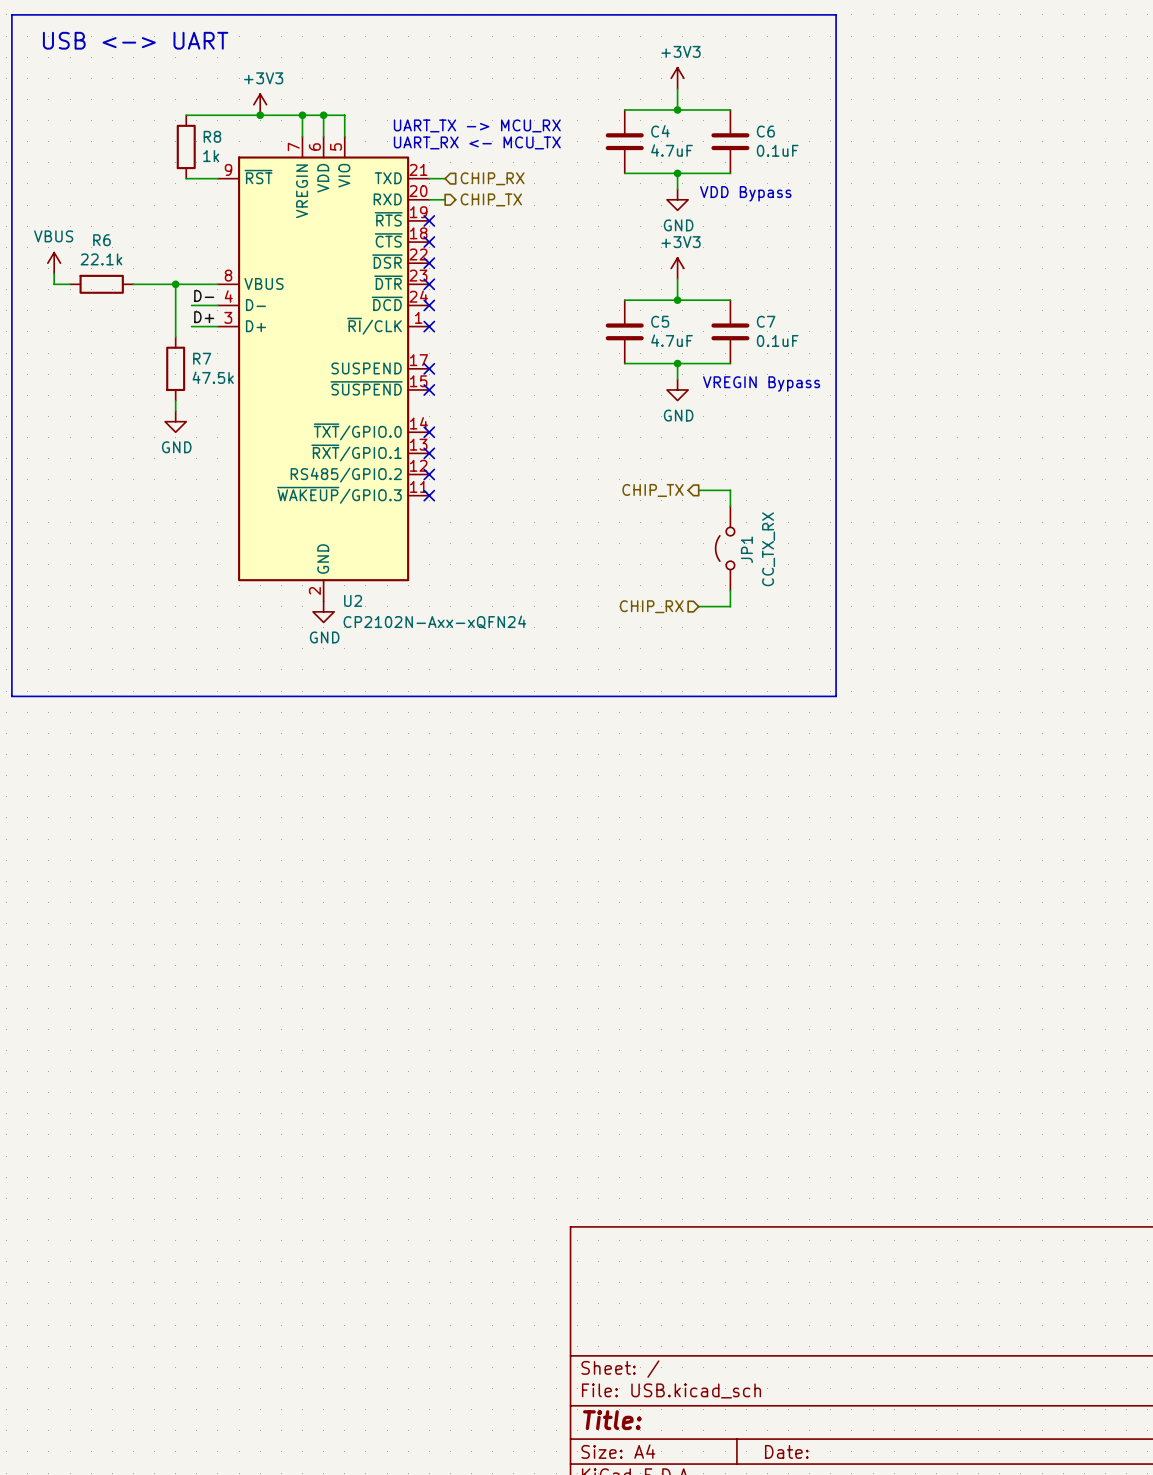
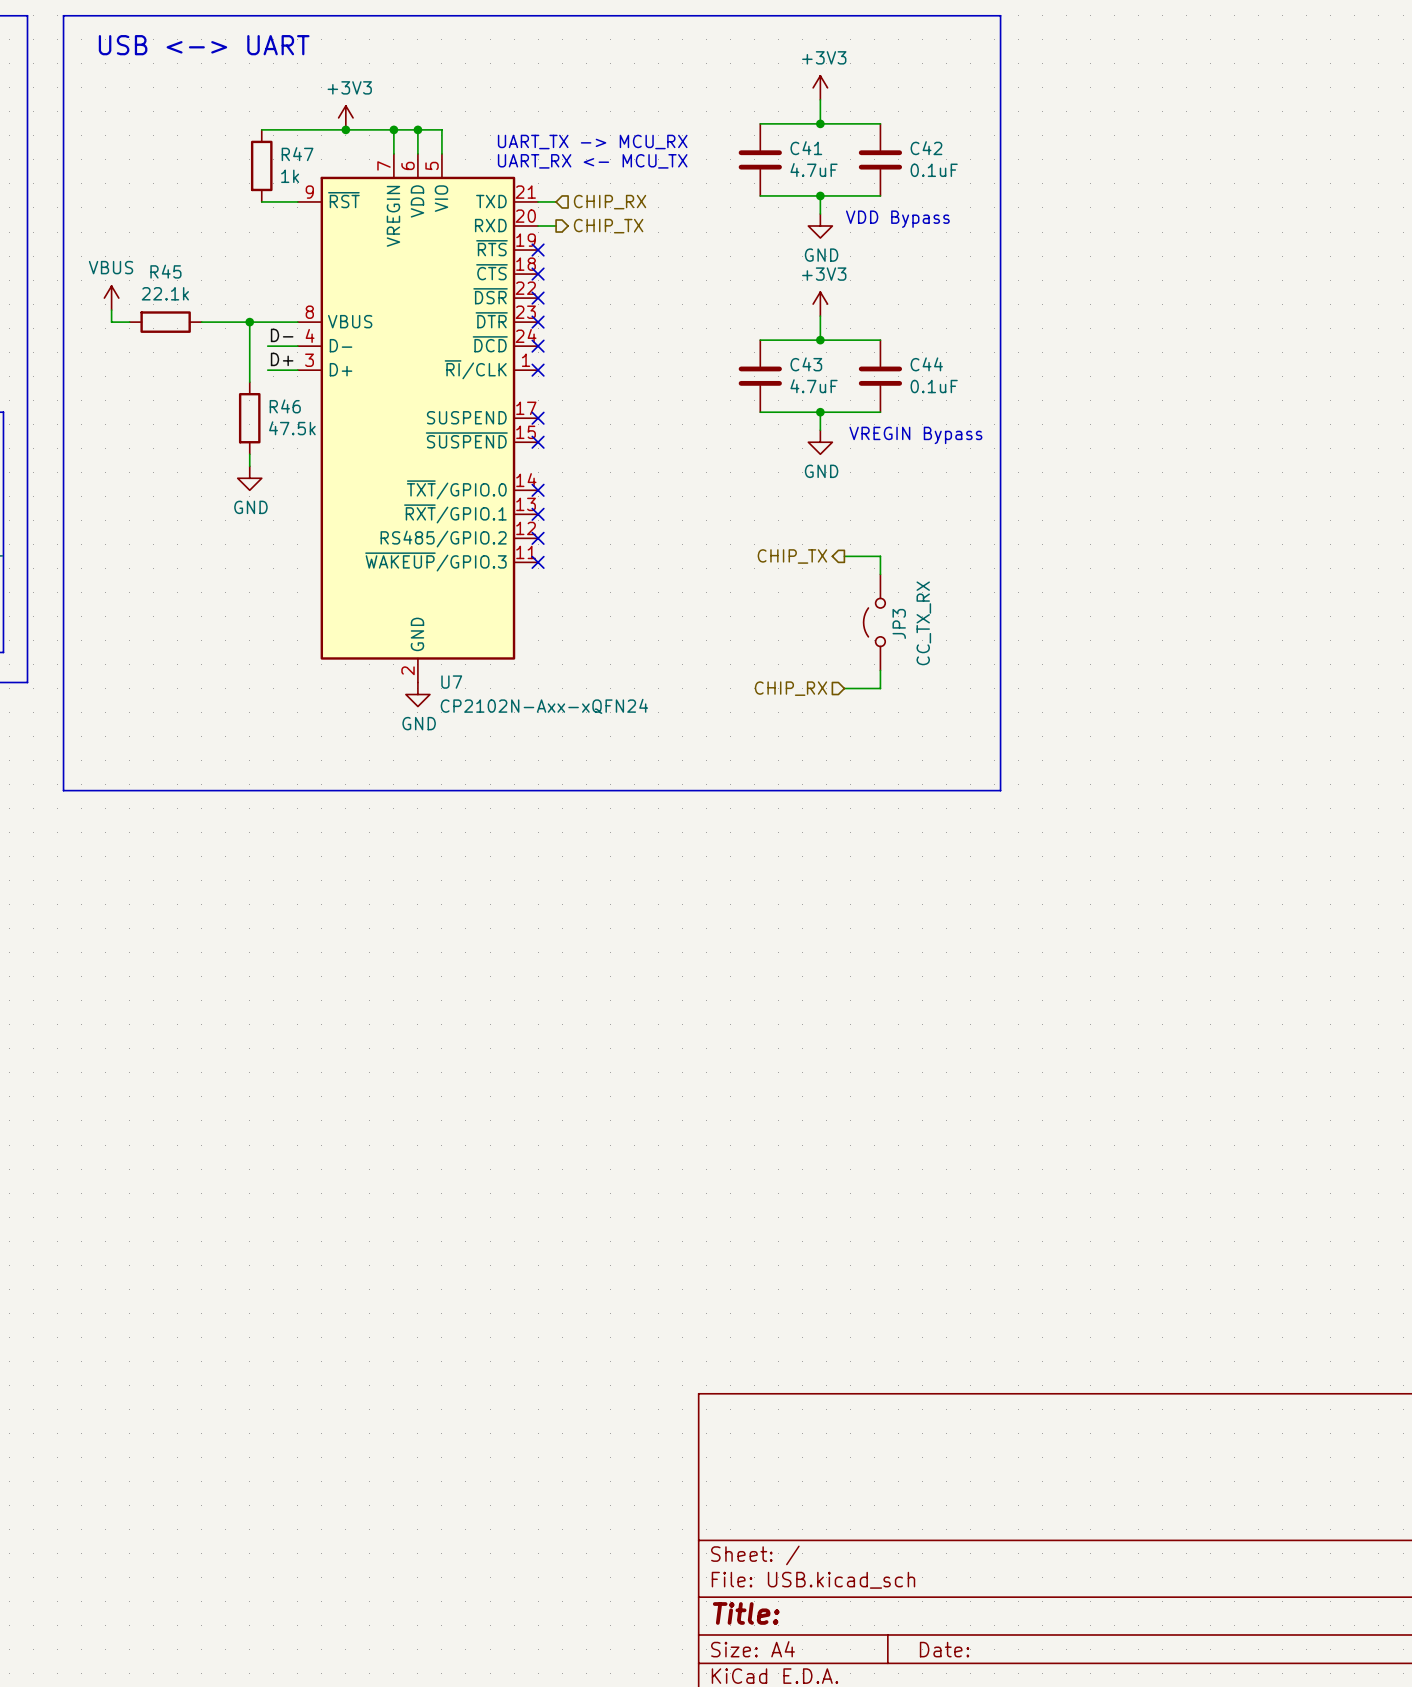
C4 name: C4 (660, 131) -> C41 (806, 148)
C6 name: C6 (765, 131) -> C42 (926, 148)
R8 name: R8 (212, 136) -> R47 (297, 154)
R6 name: R6 (101, 240) -> R45 (165, 271)
C5 name: C5 (660, 321) -> C43 (806, 364)
C7 name: C7 (766, 321) -> C44 (926, 364)
R7 name: R7 (202, 358) -> R46 (285, 406)
JP1 name: JP1 (746, 549) -> JP3 (899, 623)
U2 name: U2 (353, 600) -> U7 (451, 682)

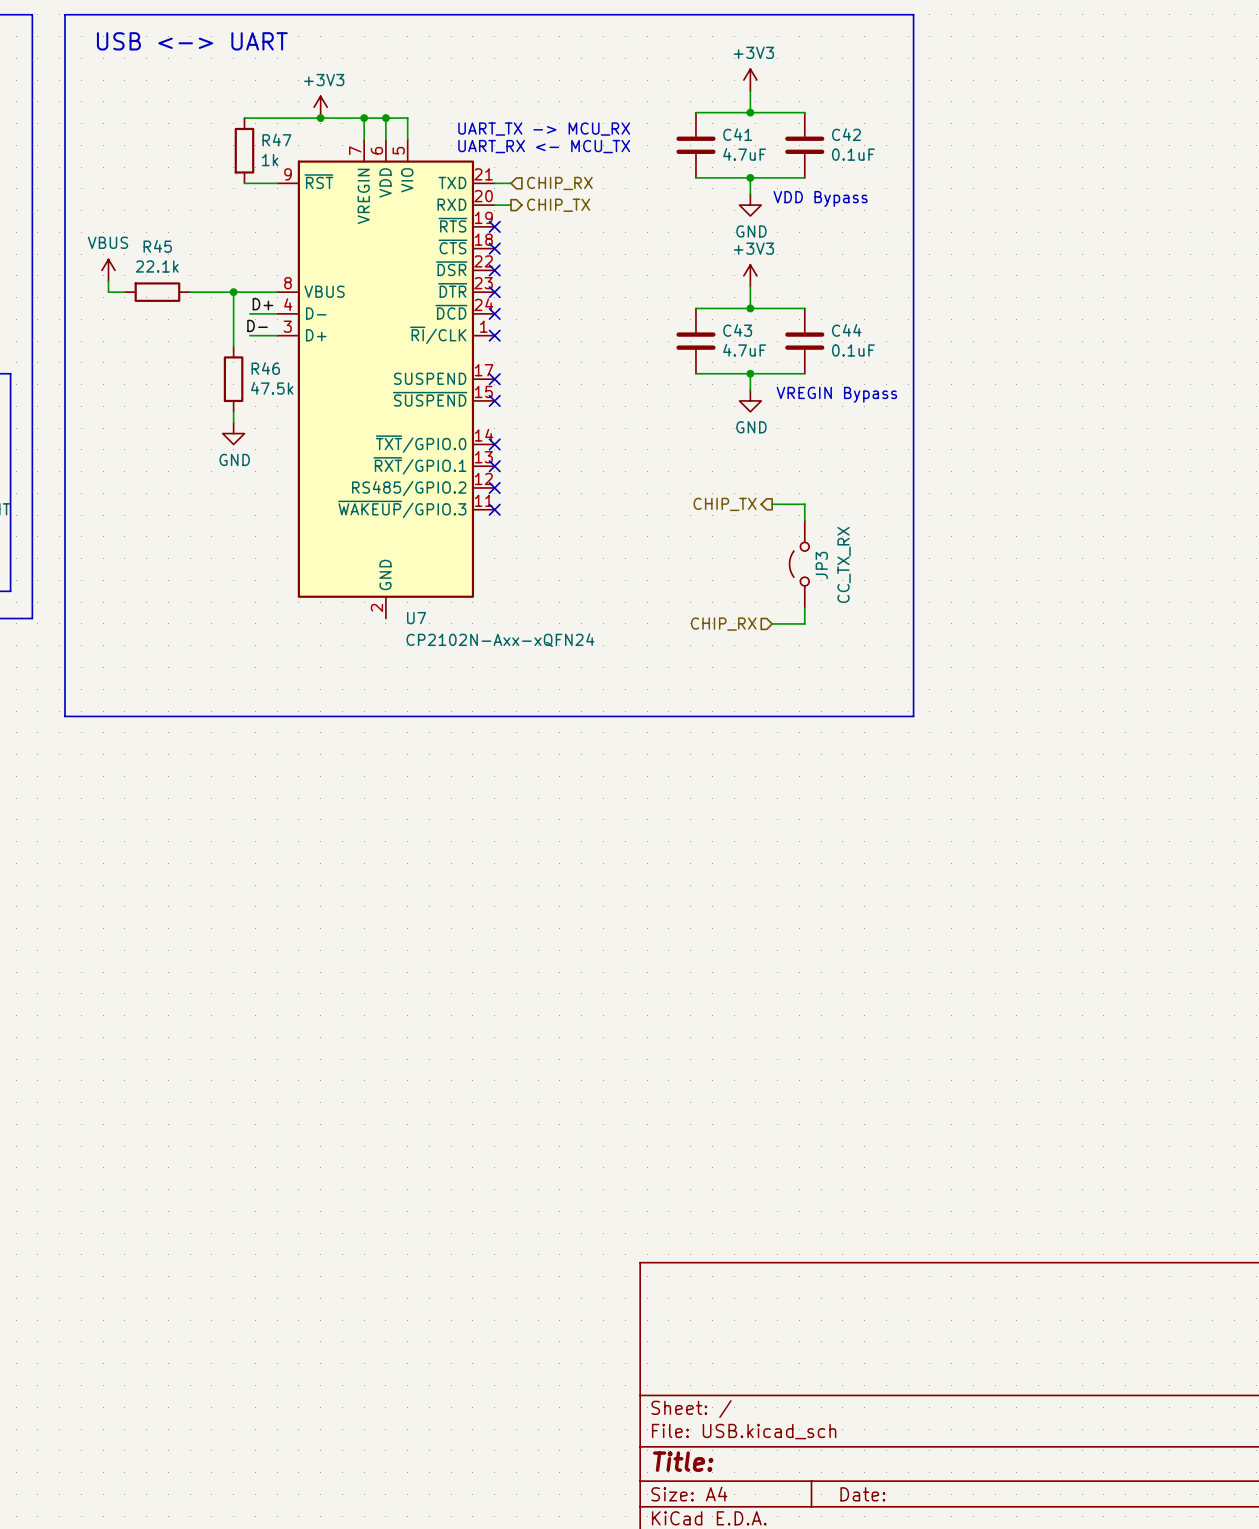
label: D- (282, 335) -> D+ (262, 304)
label: D+ (282, 359) -> D- (257, 325)
power symbol: GND (417, 694) -> none

